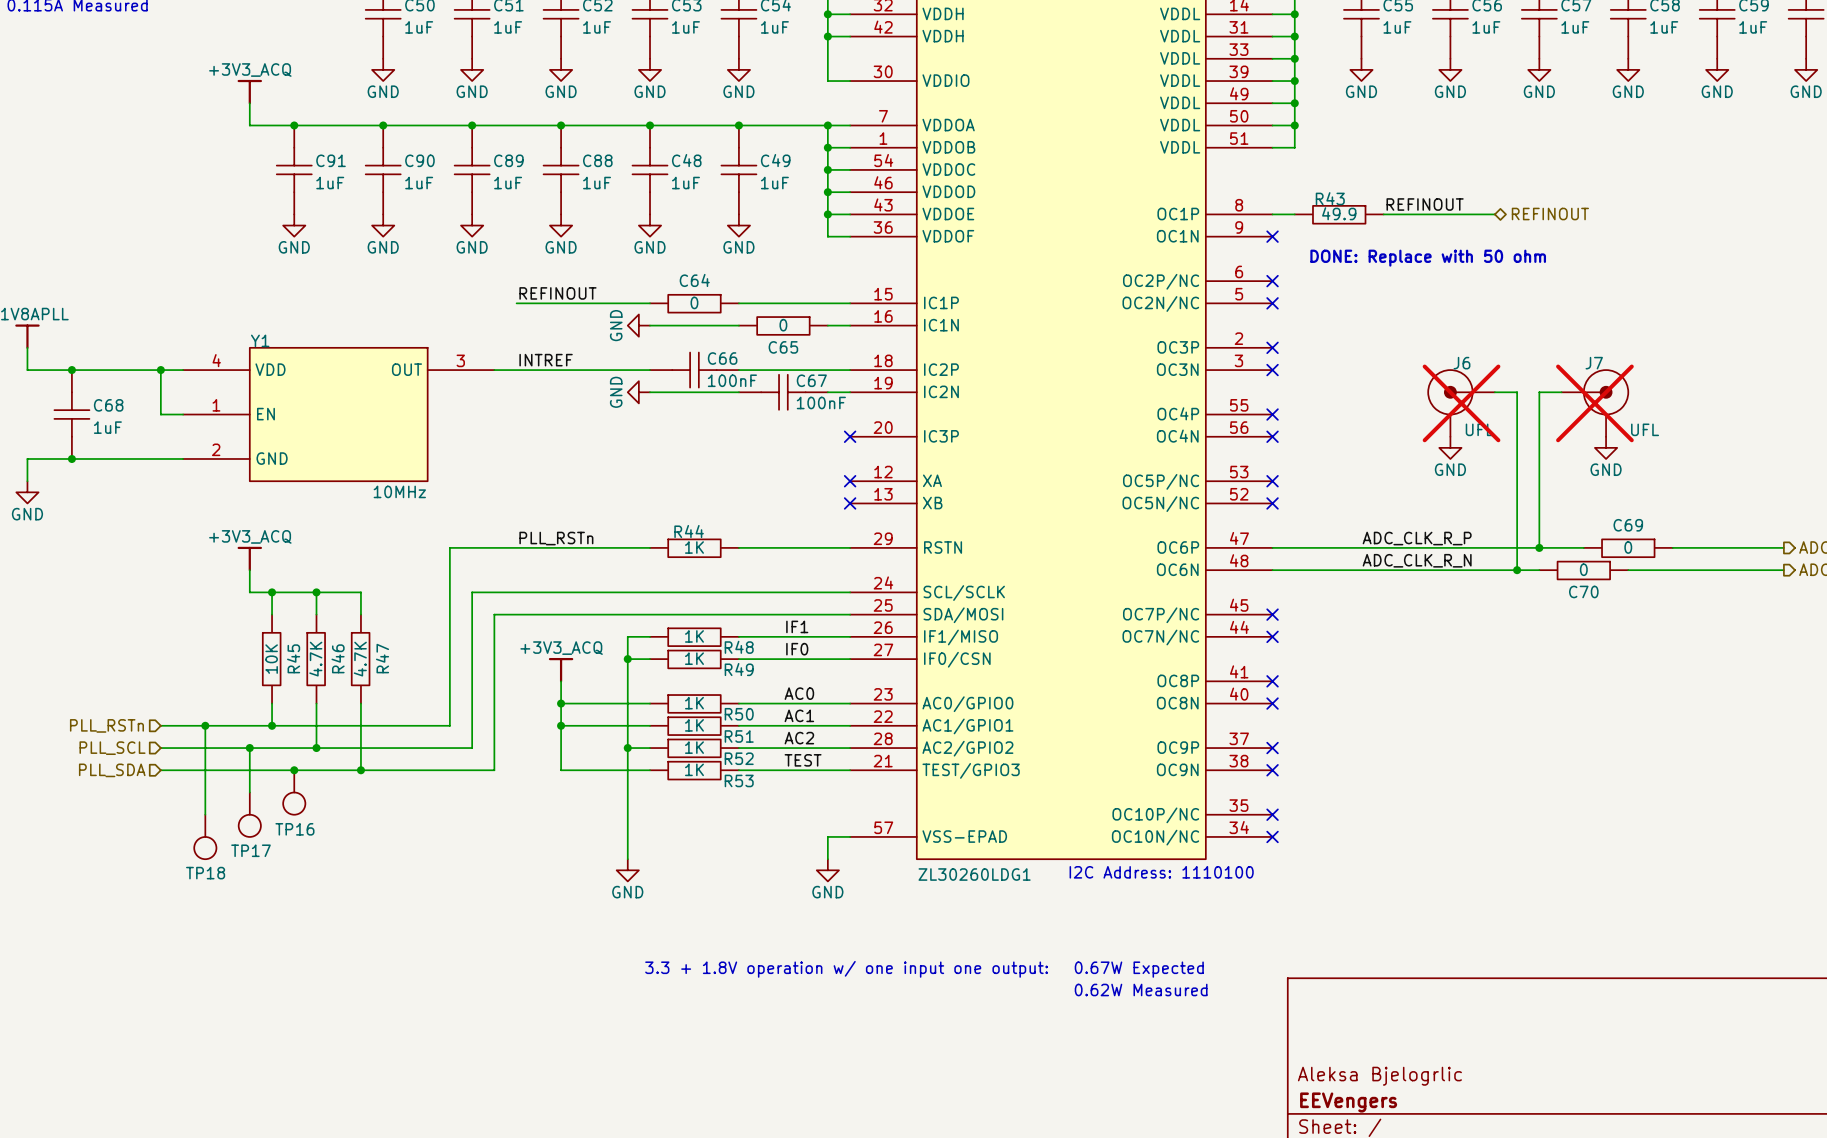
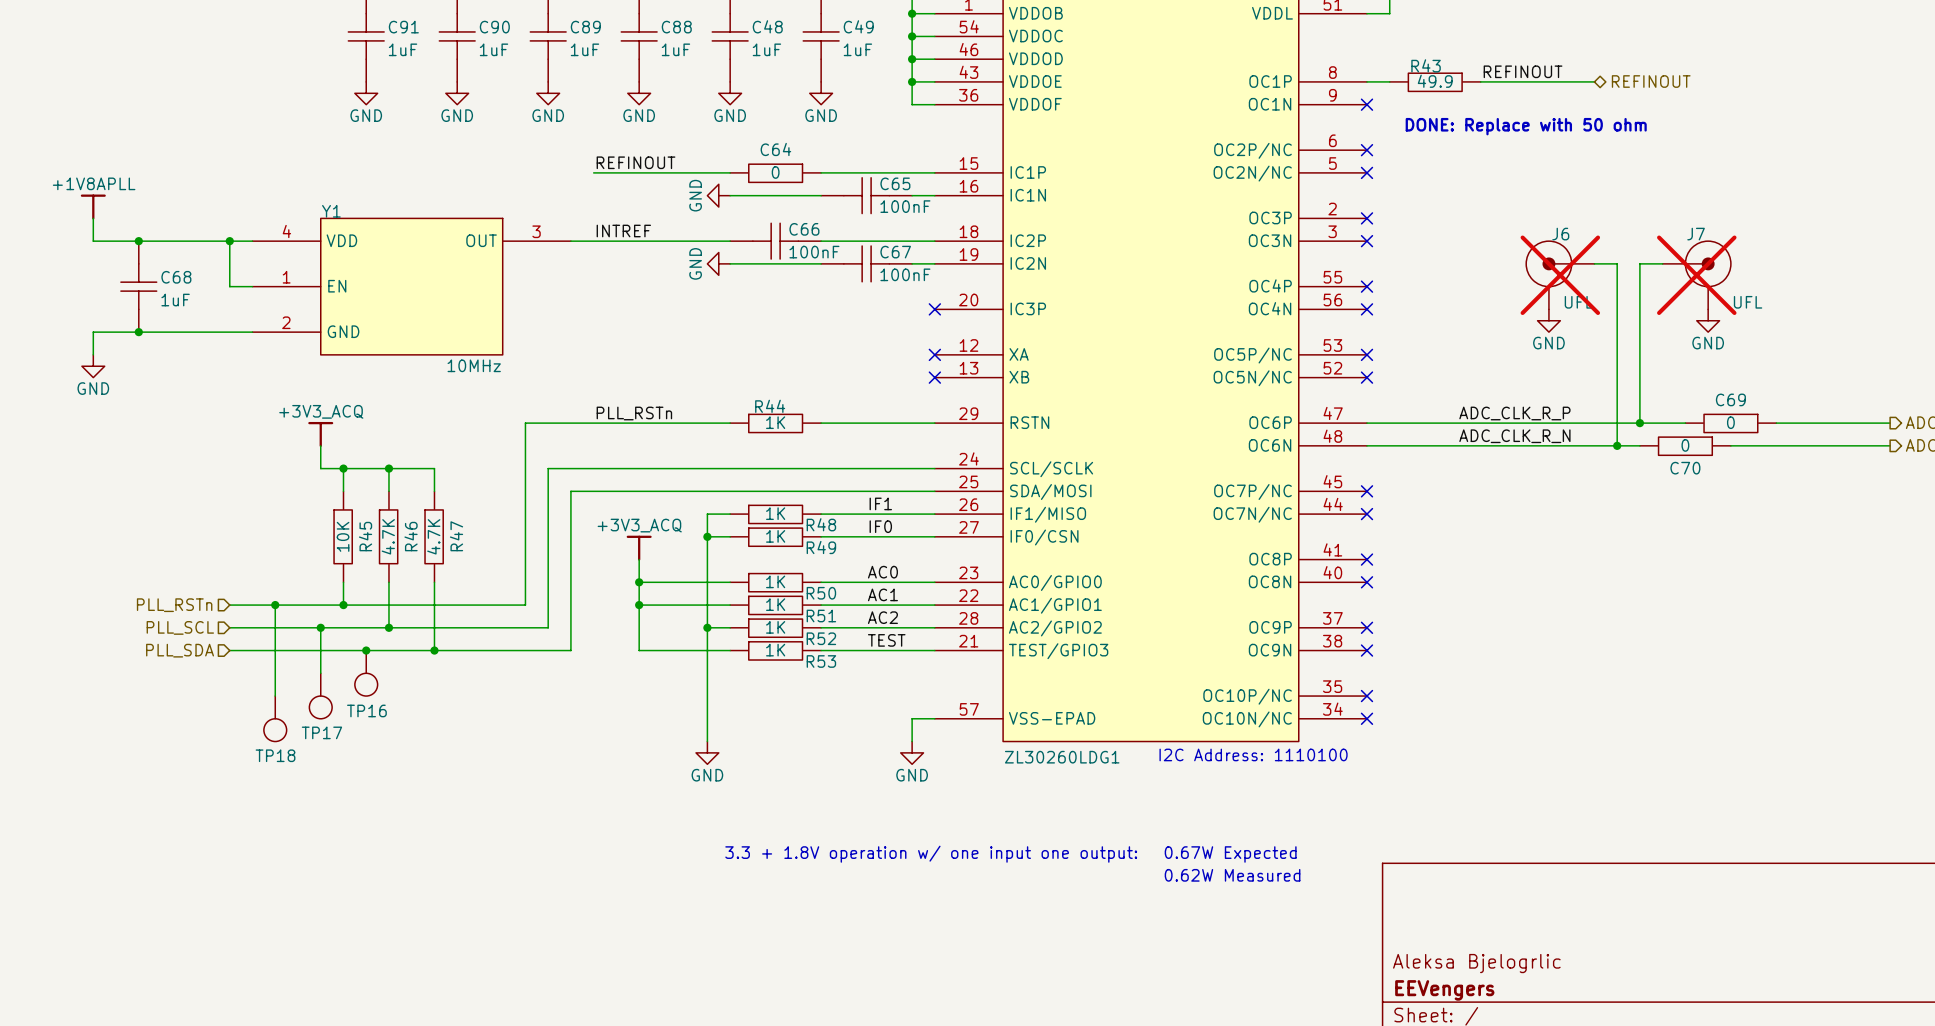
C65 symbol: [738, 317, 828, 335] -> [821, 177, 913, 214]
C65 value: 0 (783, 325) -> 100nF (905, 206)
C65 name position: C65 (783, 347) -> C65 (895, 183)

